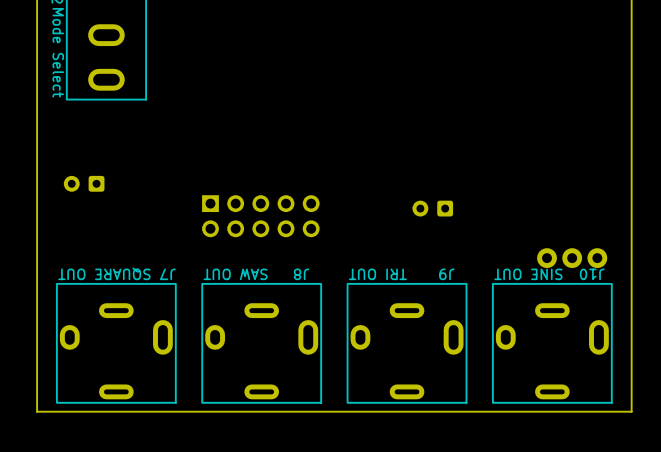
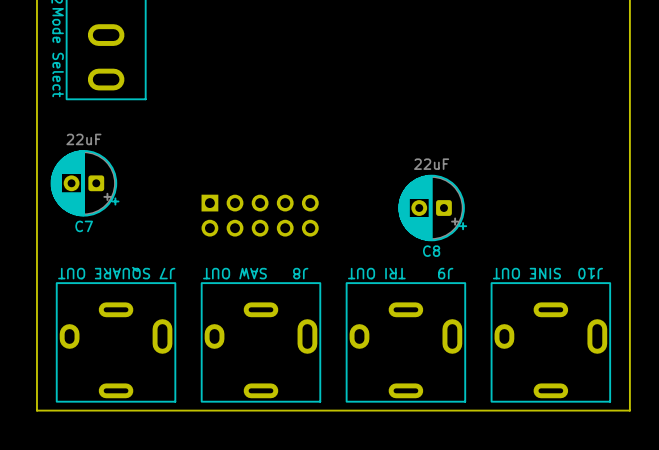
C7 side: top (84, 183) -> bottom (85, 183)
C8 side: top (432, 208) -> bottom (432, 208)
part: (572, 258) -> none

